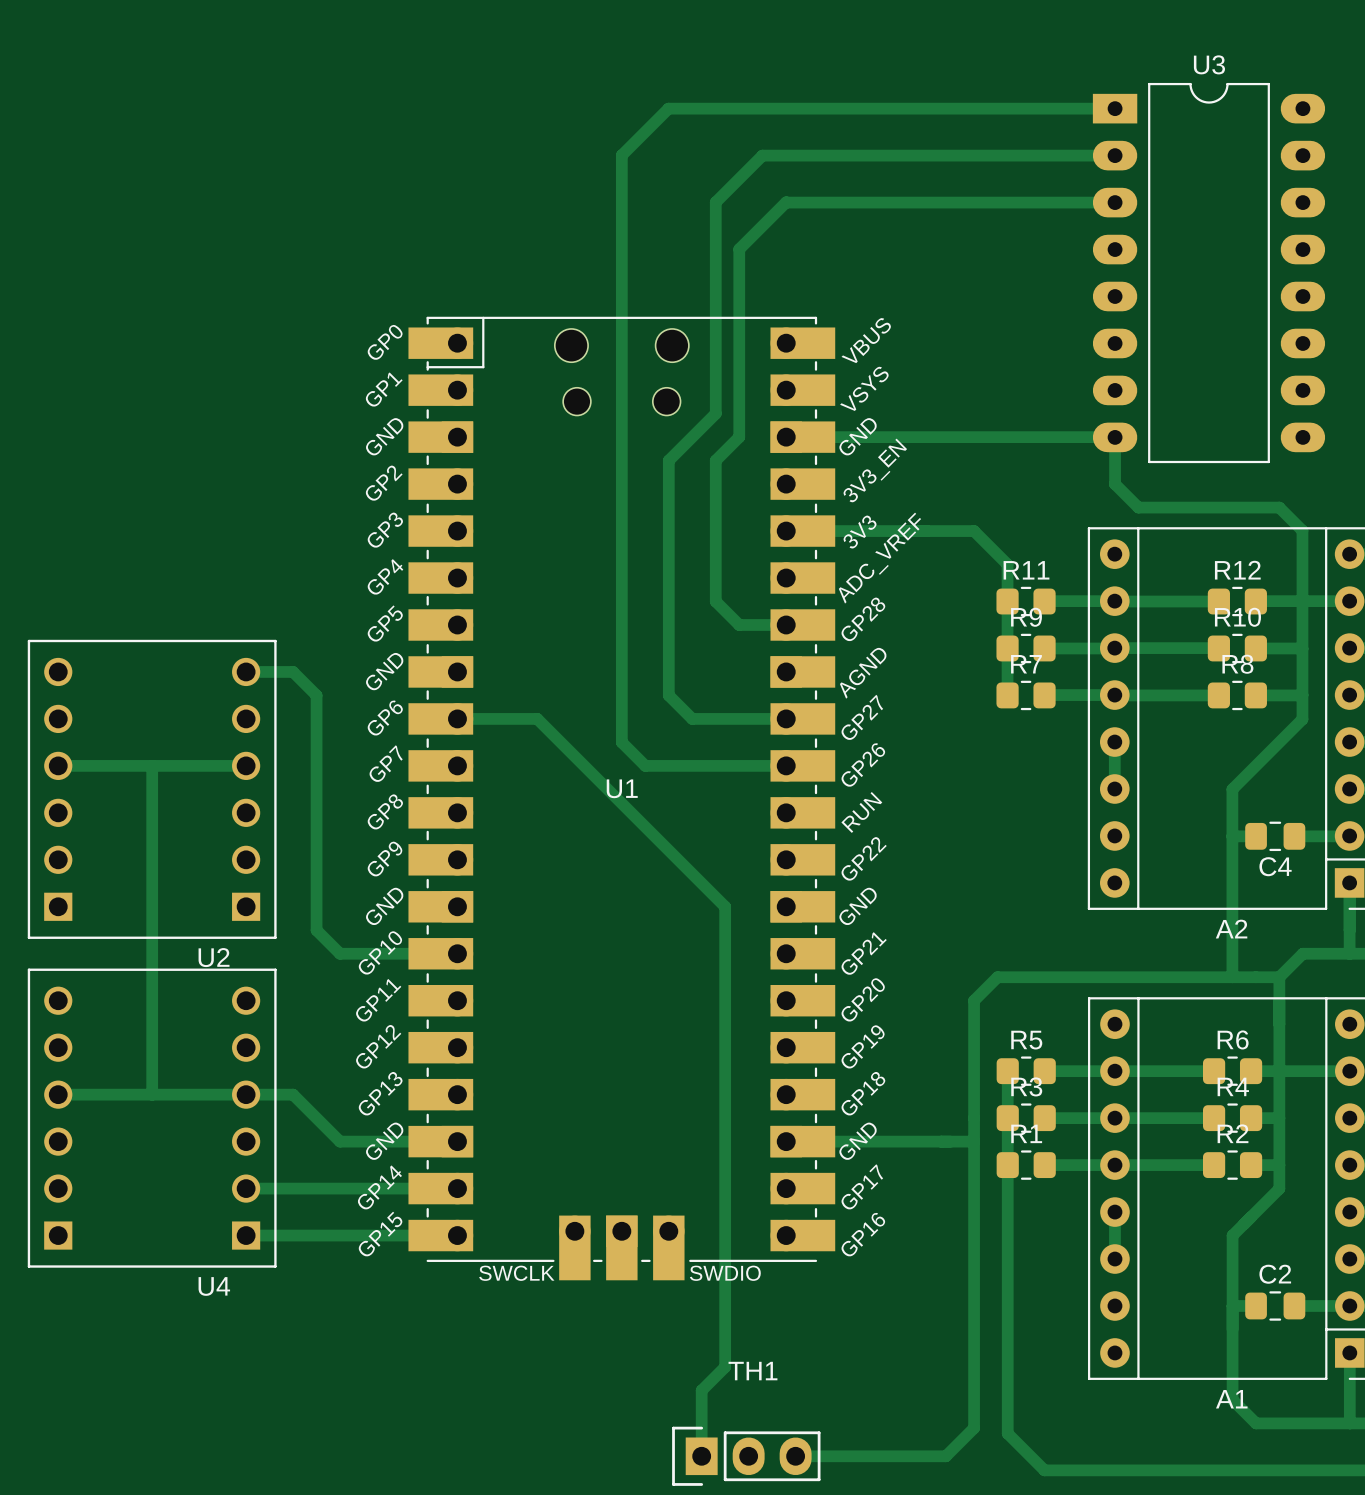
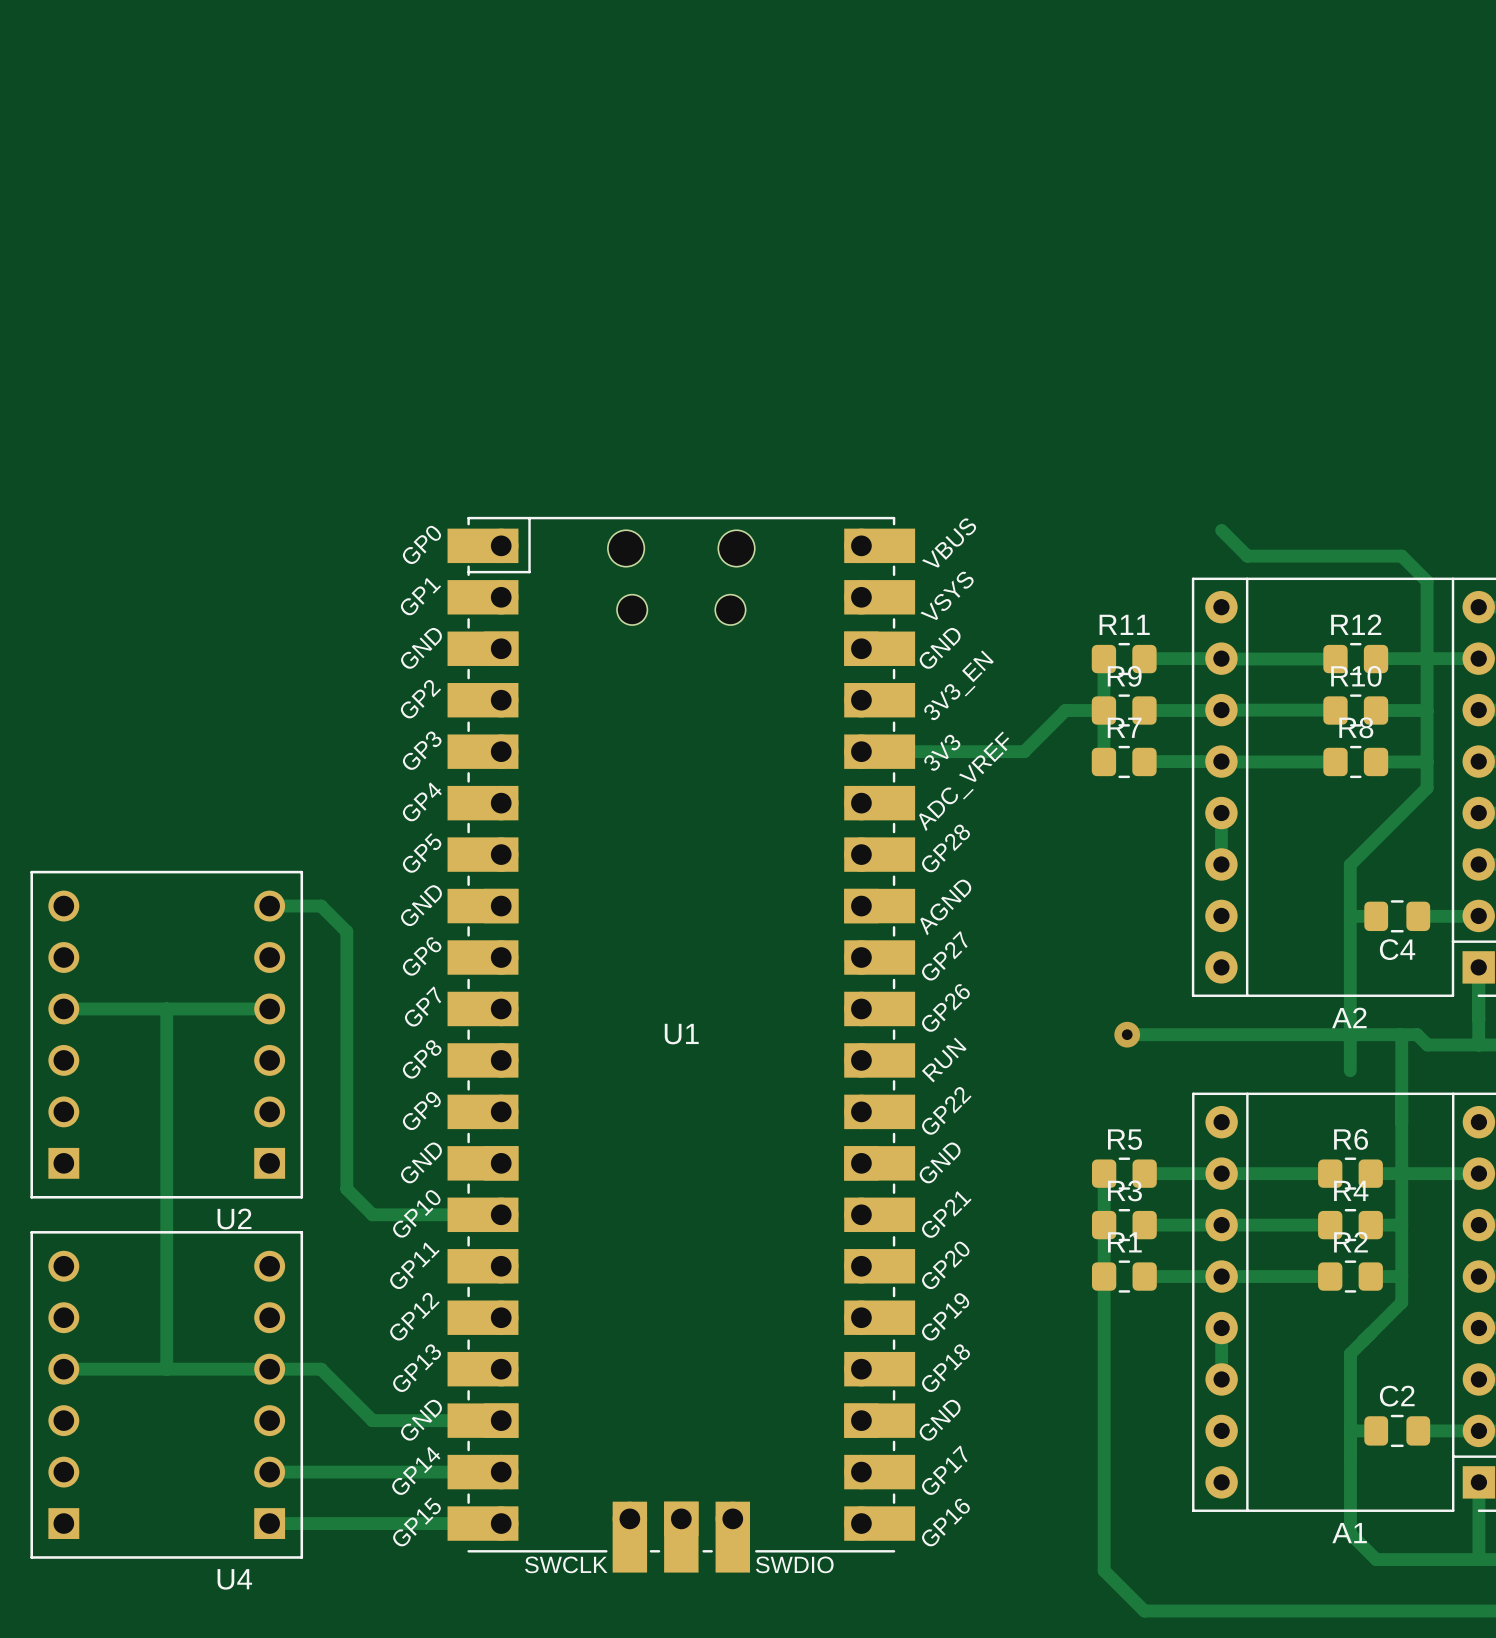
track: (1115, 108) (668, 108) (621, 155) (621, 742) (645, 765) (786, 765) -> none
track: (1115, 155) (762, 155) (715, 202) (715, 413) (668, 460) (668, 695) (692, 718) (786, 718) -> none
track: (1115, 202) (786, 202) (739, 249) (739, 437) (715, 460) (715, 601) (739, 624) (786, 624) -> none
U3: (1209, 273) -> none
track: (786, 437) (1114, 437) (1115, 484) -> none
track: (786, 531) (974, 531) (1007, 564) (1007, 601) -> none
track: none -> (1103, 710) (1065, 710) (1024, 751) (861, 751)
track: (246, 671) (293, 671) (316, 695) (316, 850) -> (269, 906) (321, 906) (346, 931)
track: (457, 718) (537, 718) (725, 906) (725, 1367) (701, 1390) (701, 1456) -> none
track: (58, 765) (246, 765) -> (63, 1008) (269, 1008)
track: (152, 765) (152, 920) -> (166, 1199) (166, 1369)
U2 position: (152, 789) -> (166, 1034)
U1 position: (621, 798) -> (681, 1044)
track: (316, 930) (340, 953) (457, 953) -> (346, 1019) (346, 1189) (372, 1214) (501, 1214)
via: none -> (1127, 1034)
track: none -> (1399, 1034) (1401, 1036) (1401, 1070)
track: (1302, 953) (1279, 977) (997, 977) (974, 1000) (974, 1428) (945, 1456) (795, 1456) -> (1427, 1044) (1417, 1034) (1127, 1034)
track: (58, 1094) (293, 1094) (340, 1141) (457, 1141) -> (63, 1369) (321, 1369) (372, 1420) (501, 1420)
U4 position: (152, 1118) -> (166, 1394)
track: (786, 1141) (974, 1141) -> none
track: (246, 1188) (457, 1188) -> (269, 1472) (501, 1472)
track: (246, 1235) (457, 1235) -> (269, 1523) (501, 1523)
TH1: (746, 1456) -> none

